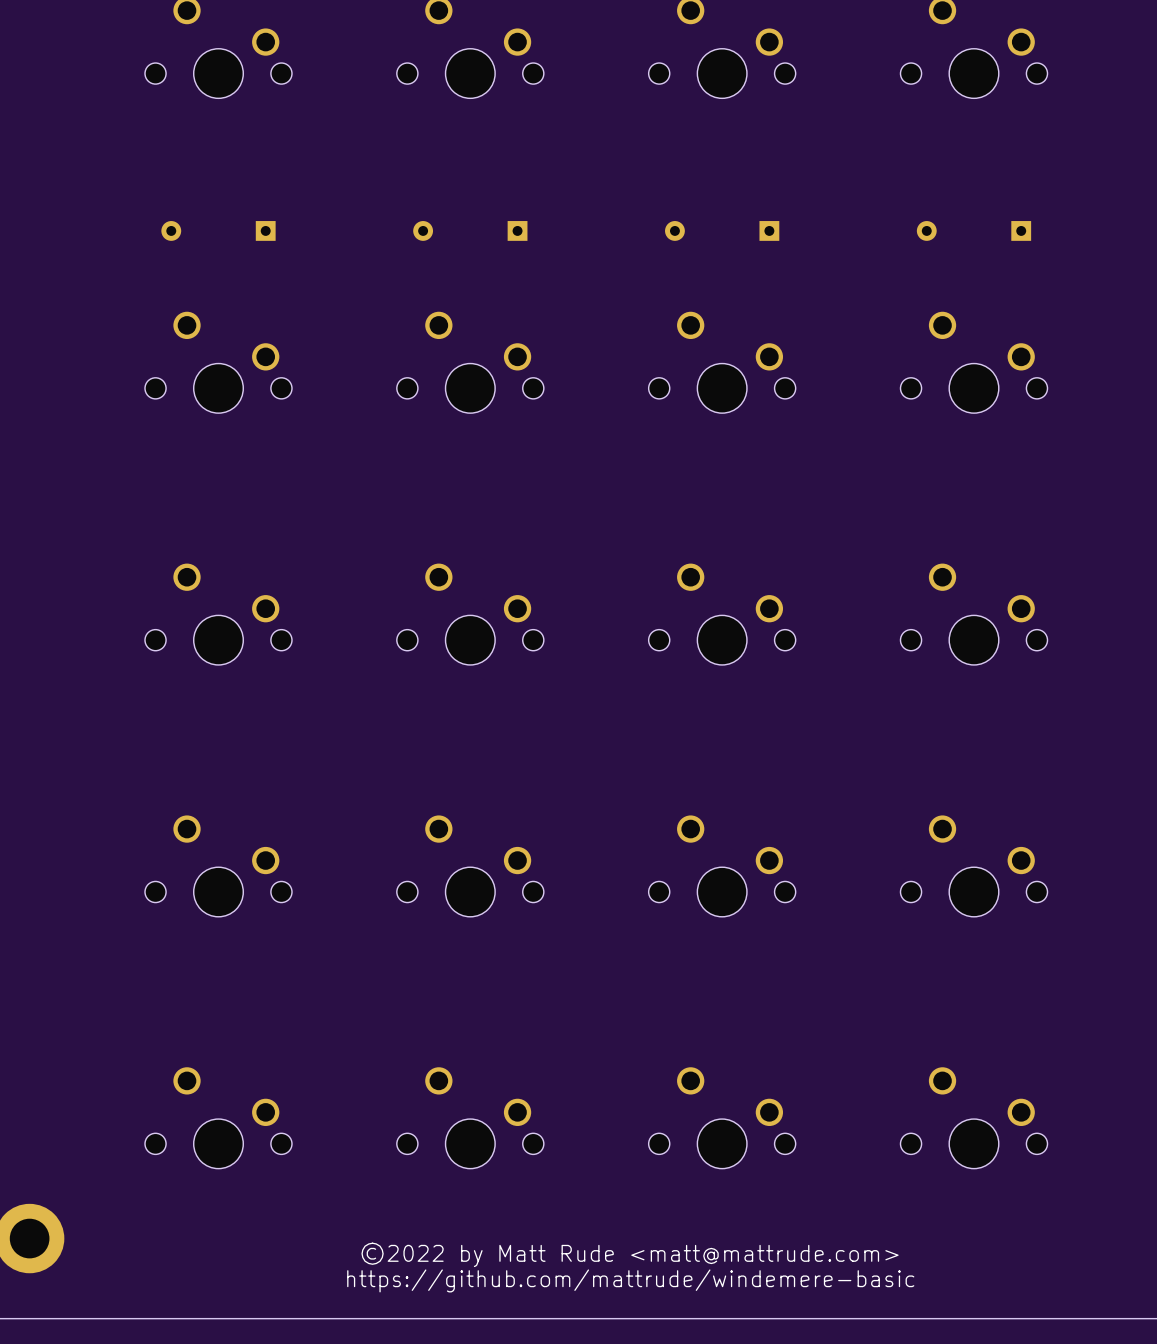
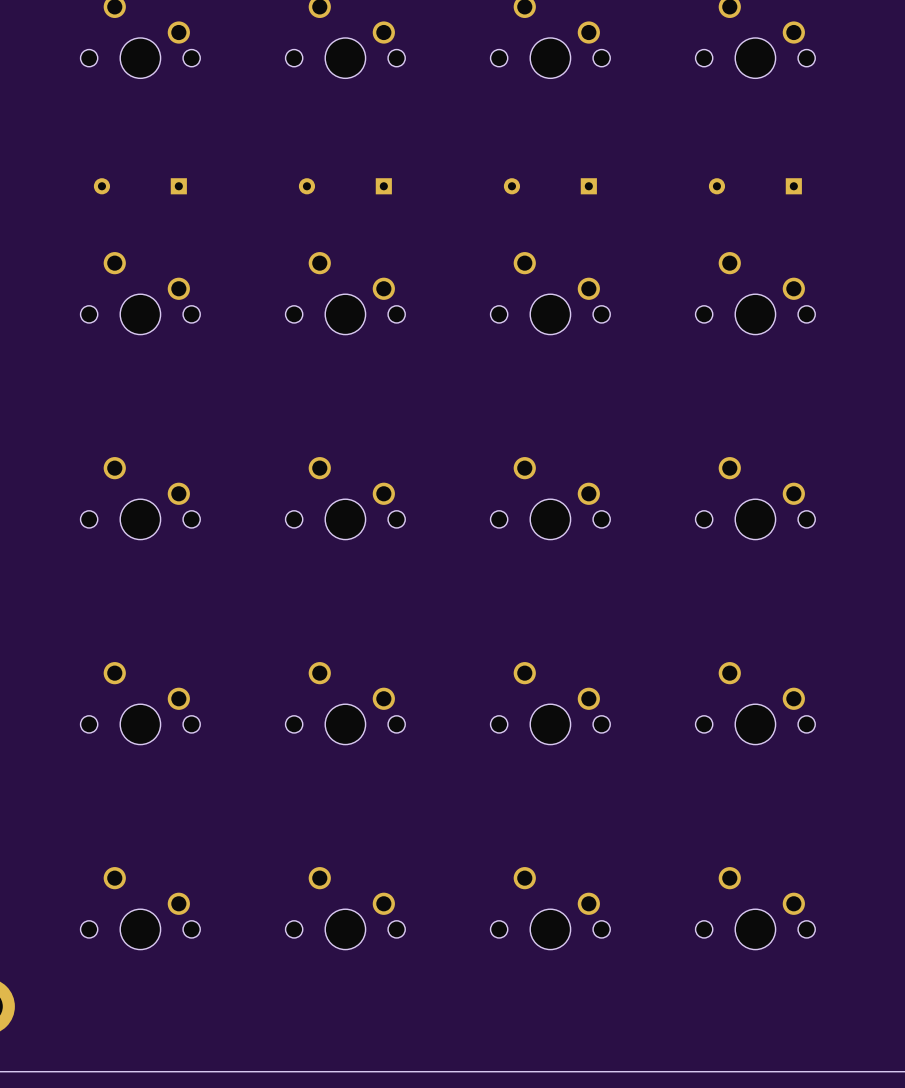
text: ©2022 by Matt Rude <matt@mattrude.com> (630, 1254) -> none
text: https://github.com/mattrude/windemere-basic (630, 1280) -> none

